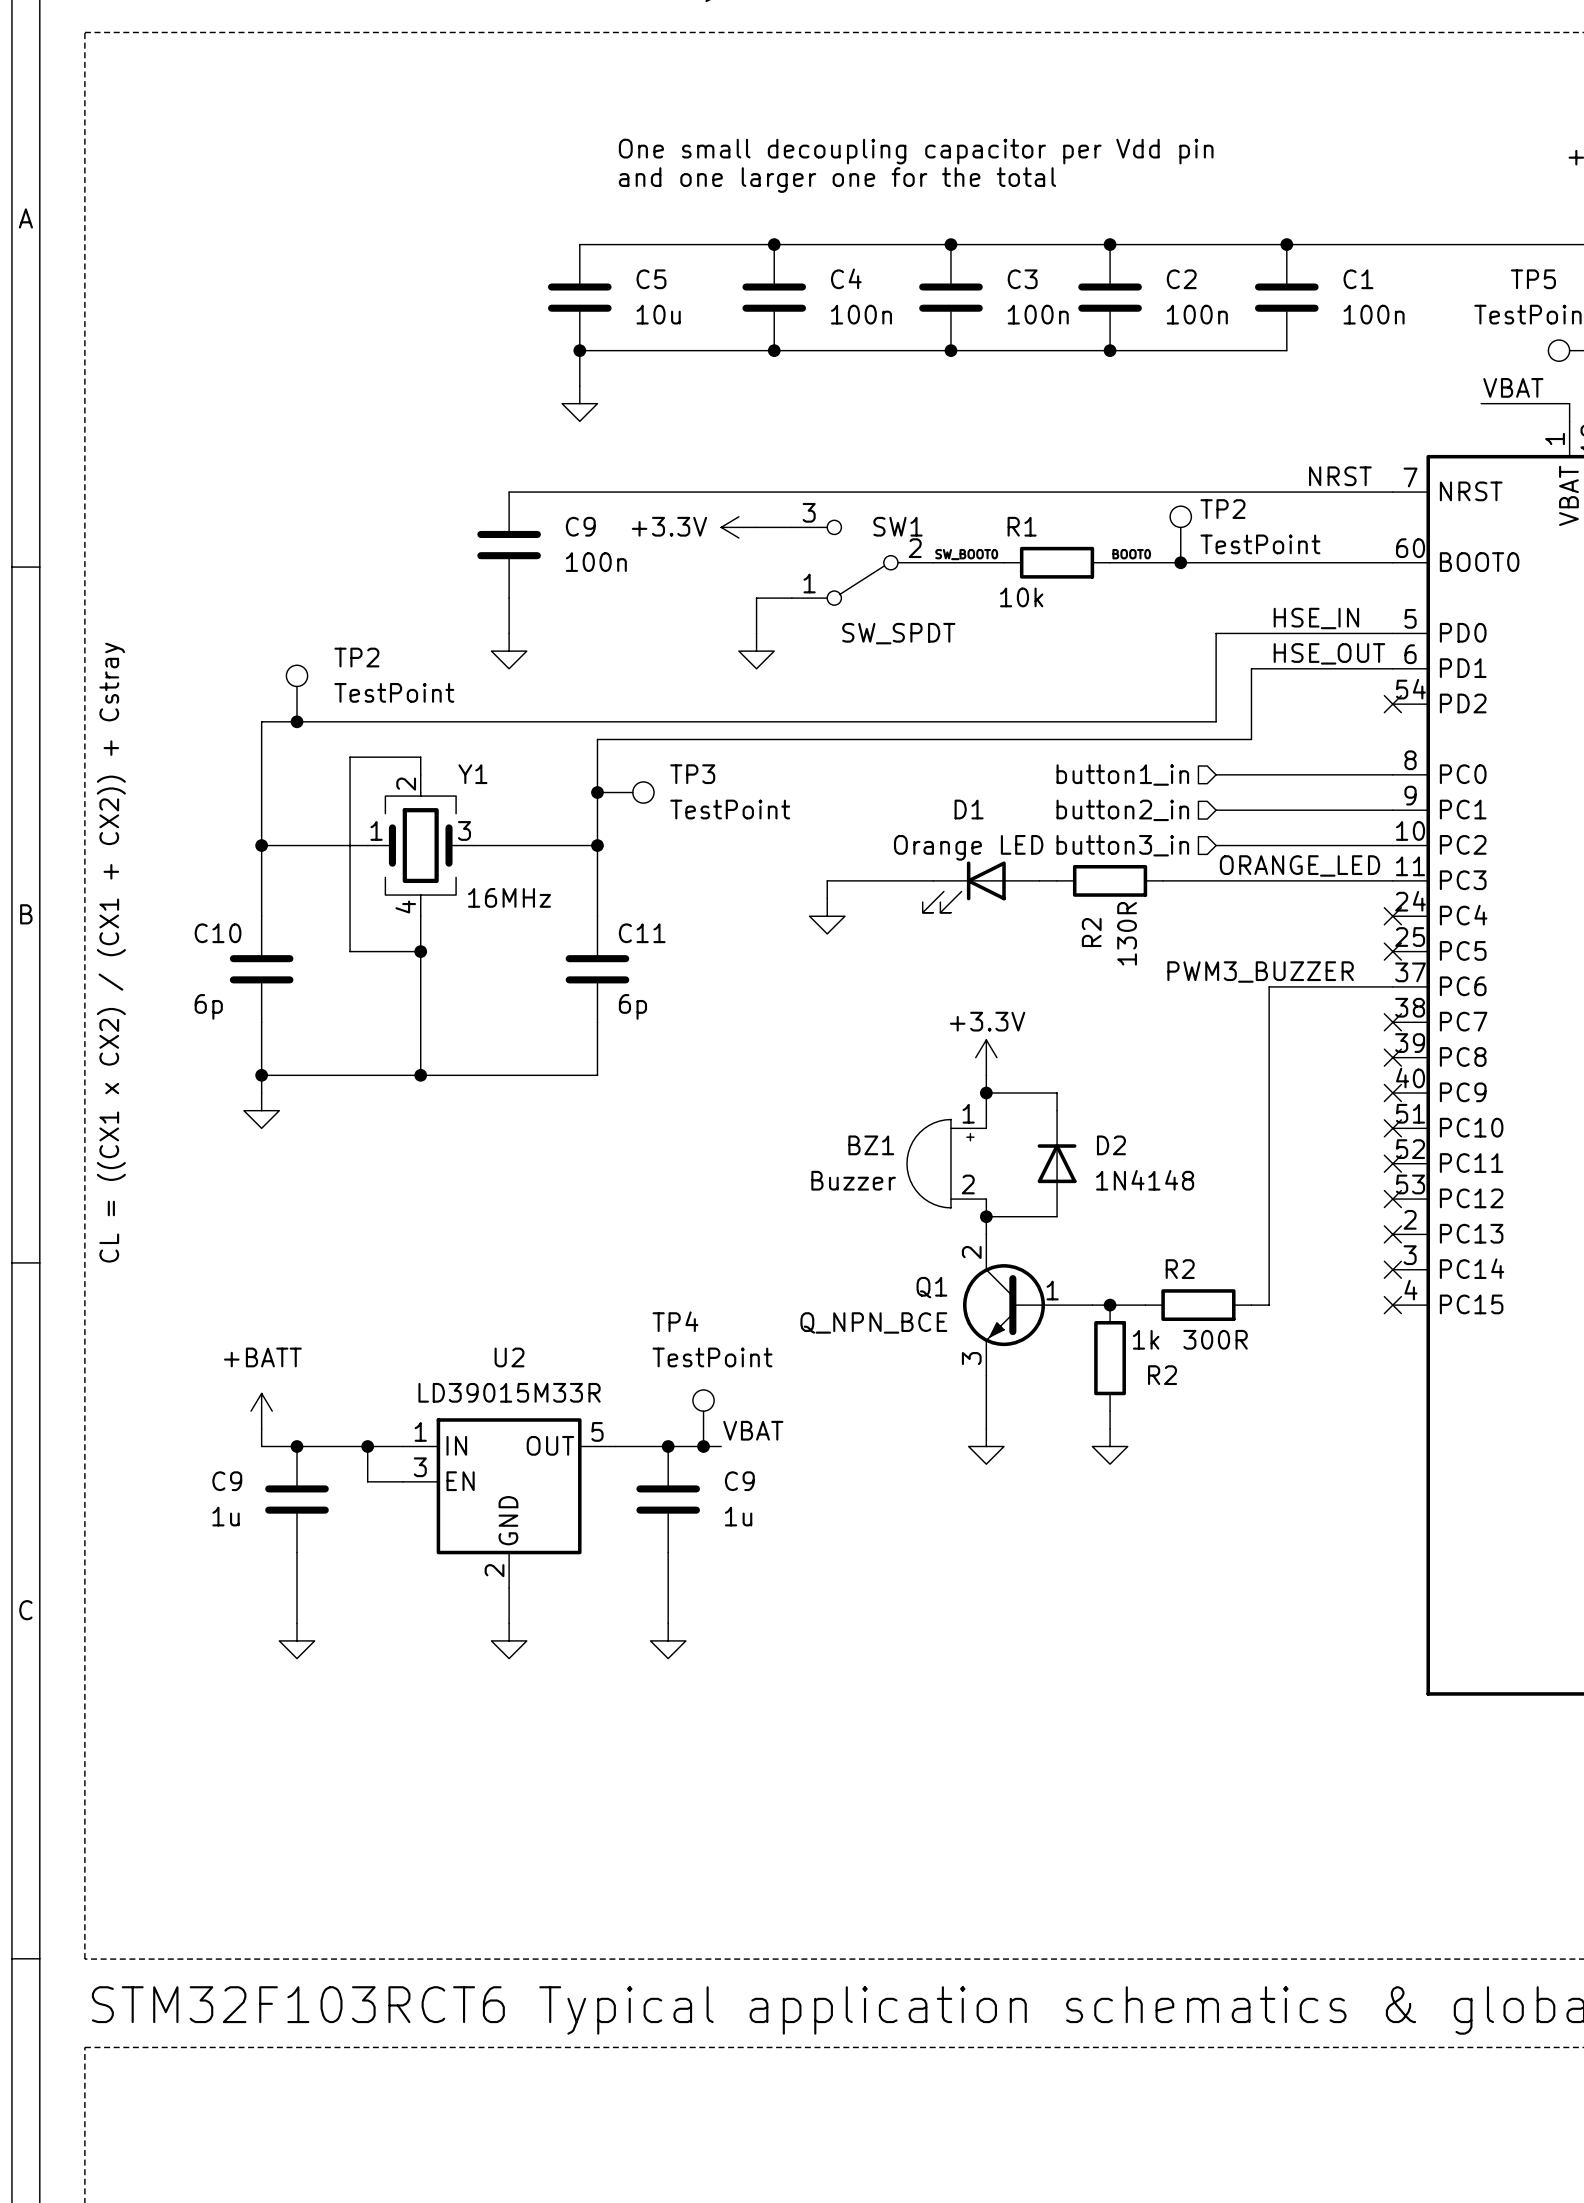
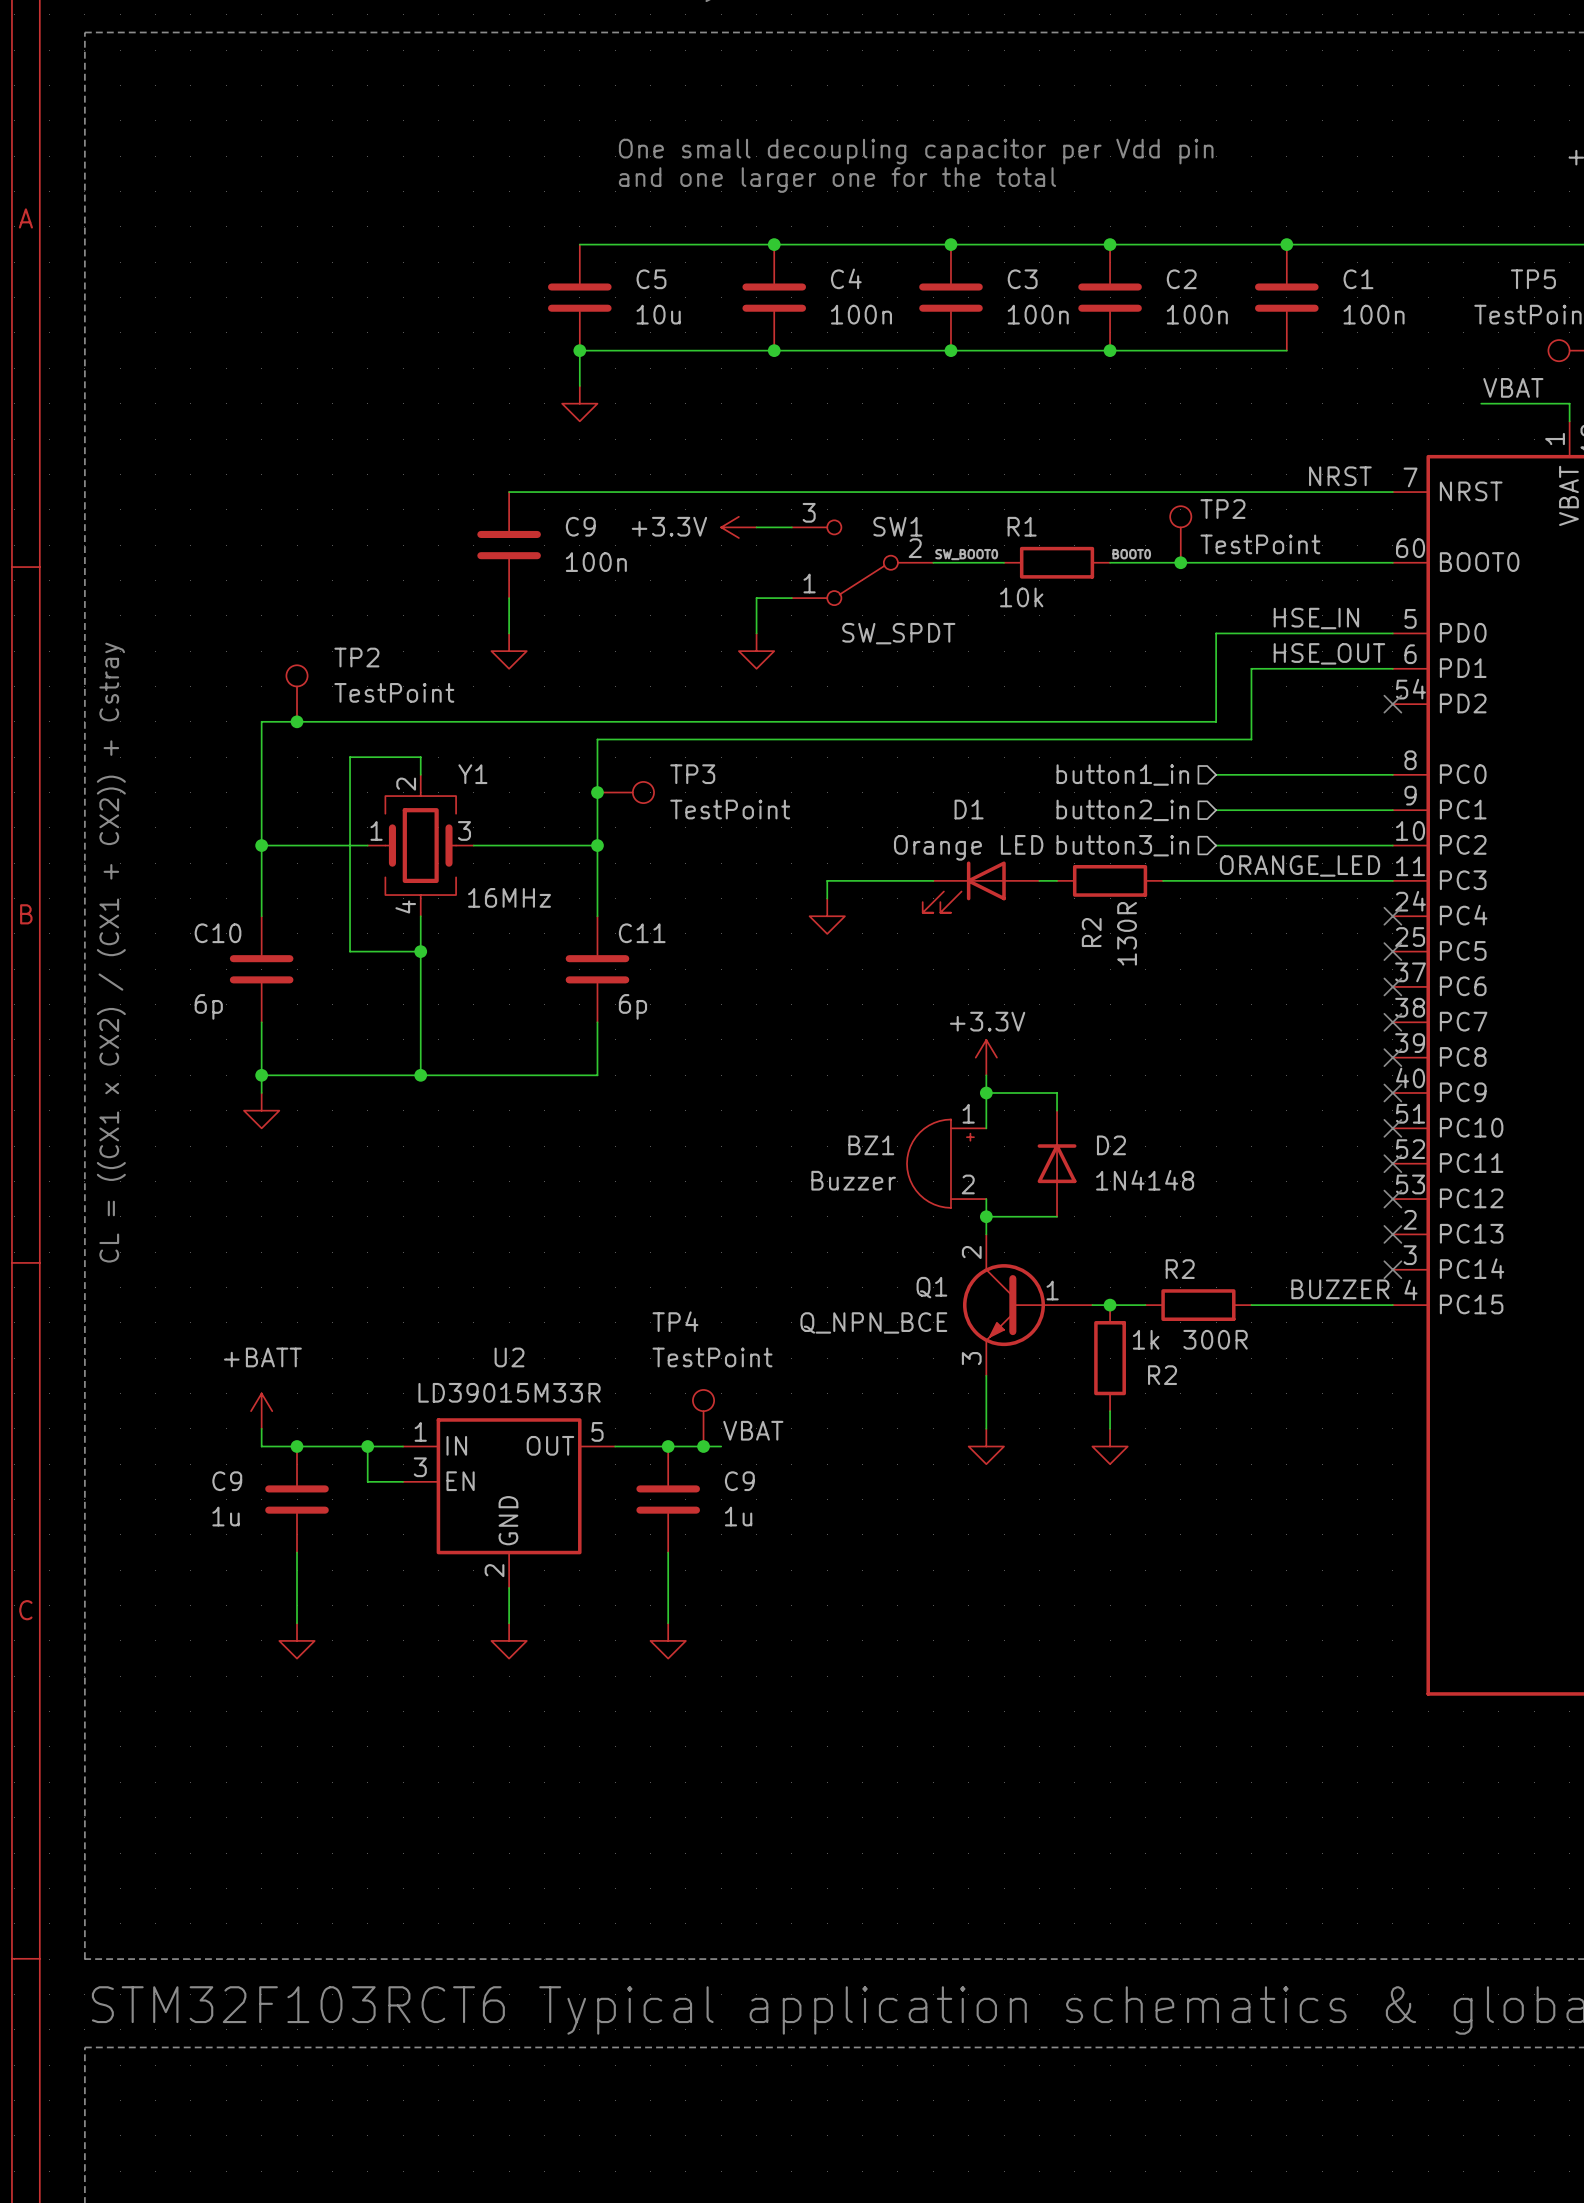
label: PWM3_BUZZER (1260, 972) -> none
wire: (1392, 986) (1269, 986) (1269, 1305) -> (1392, 1305) (1269, 1305)
no-connect mark: none -> (1392, 986)
label: none -> BUZZER (1340, 1289)
no-connect mark: (1392, 1305) -> none

